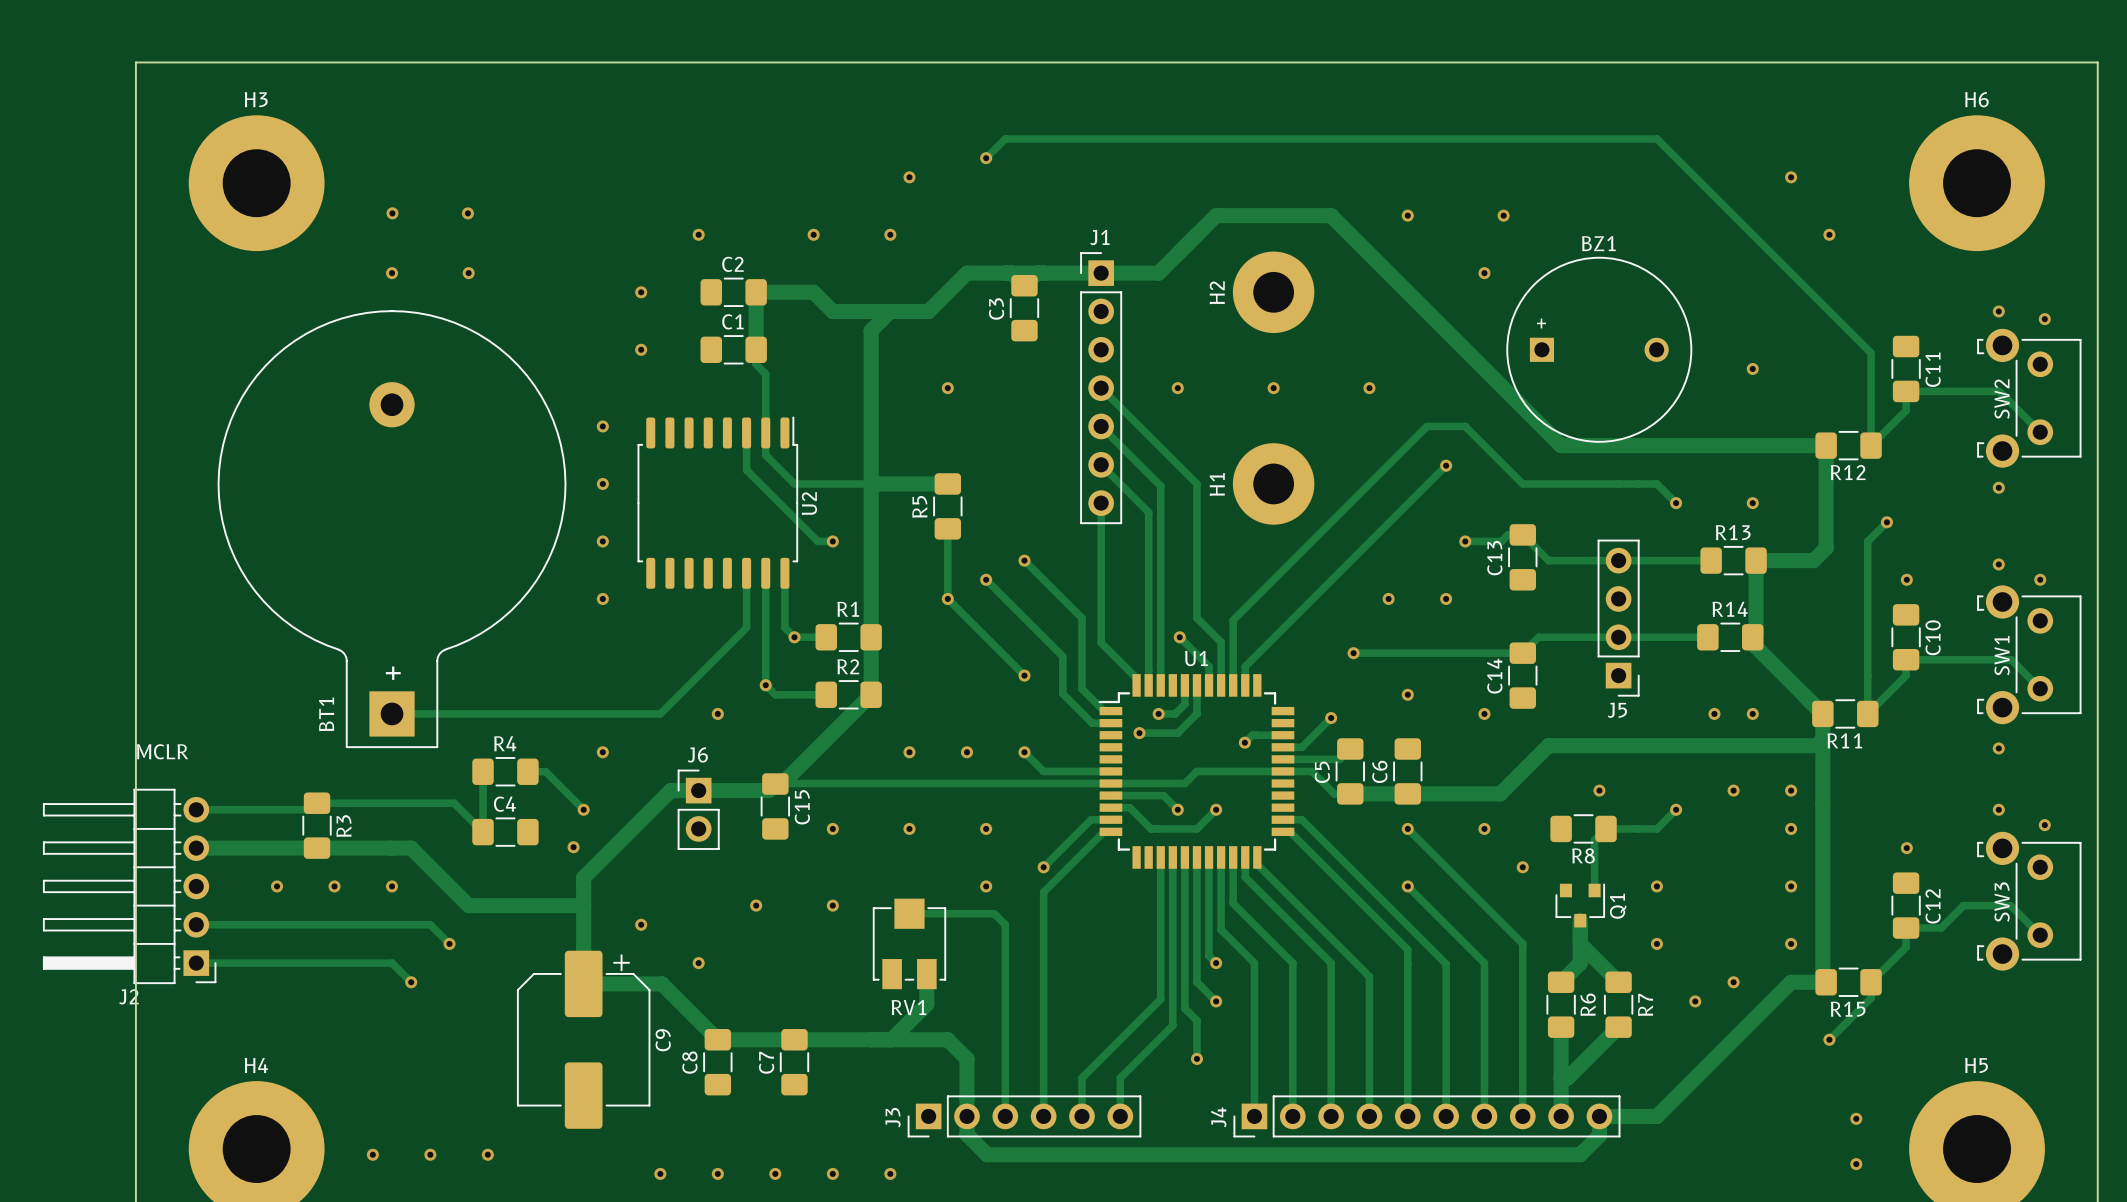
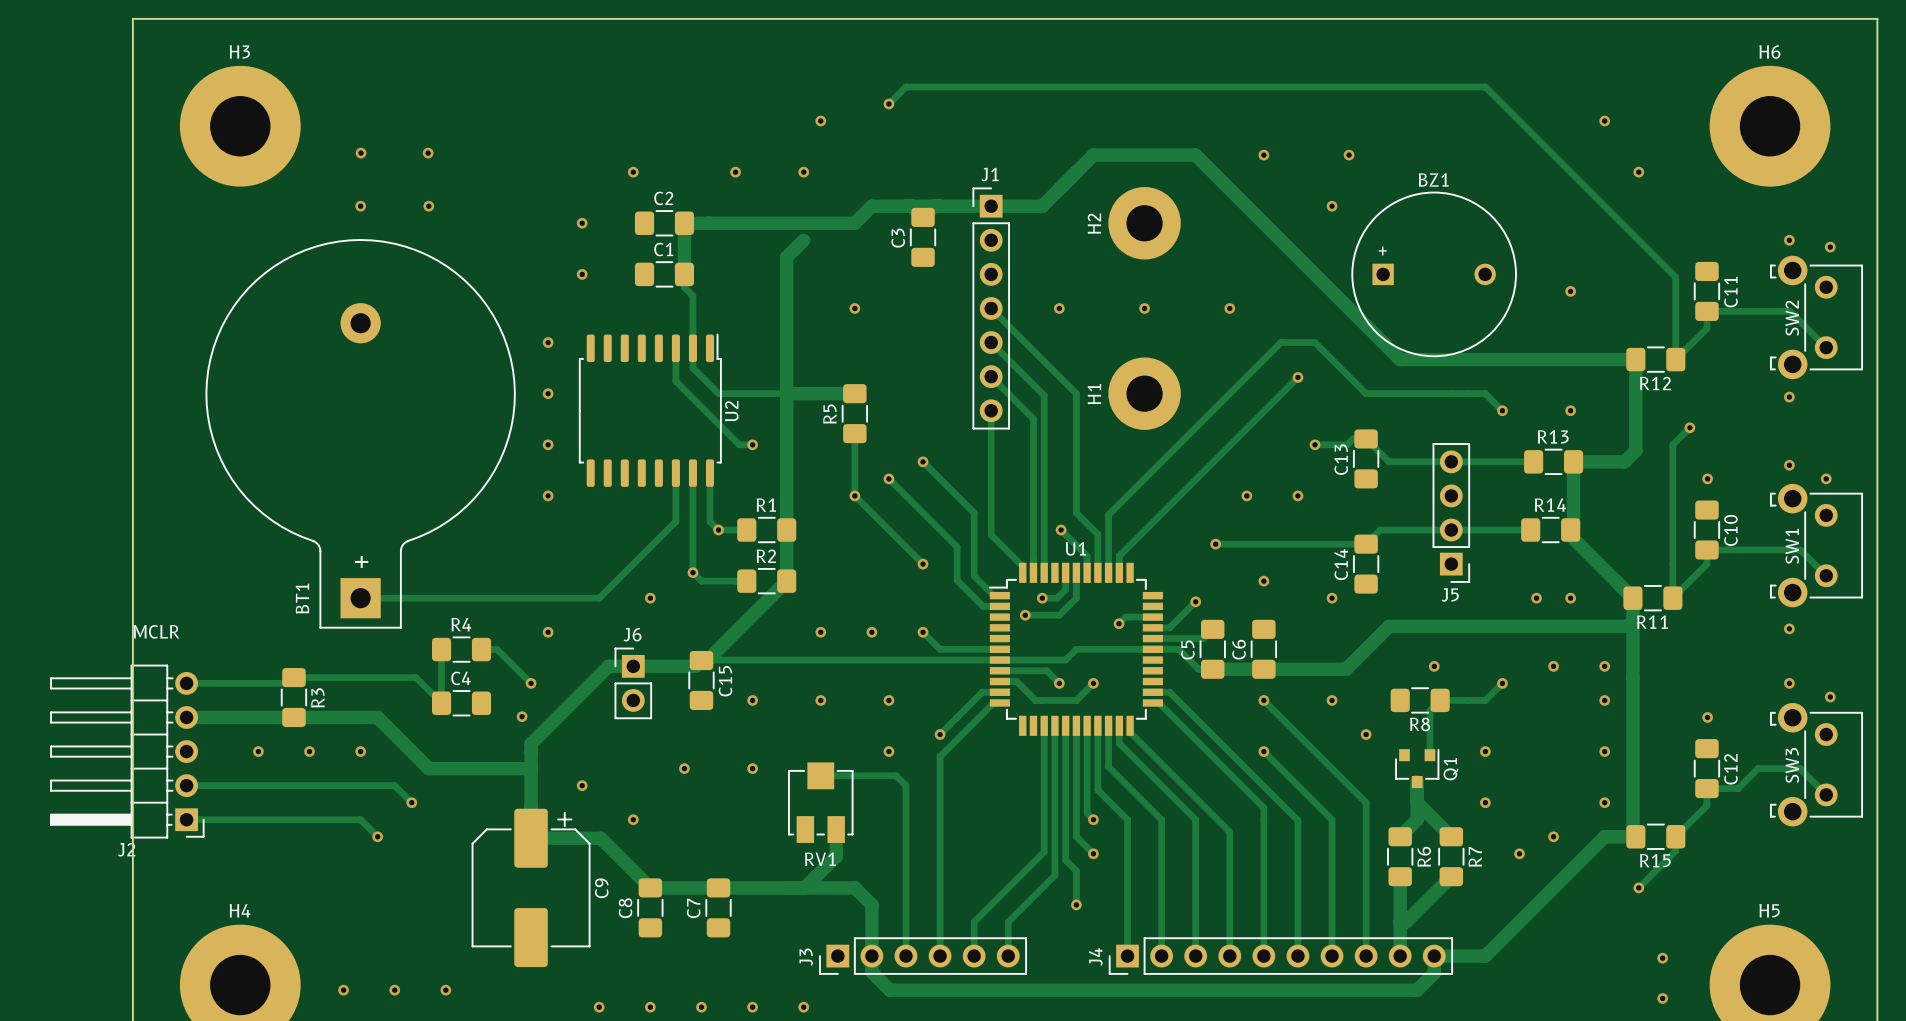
track: (813, 292) (832, 311) (928, 311) (947, 292) -> (735, 223) (854, 223)

